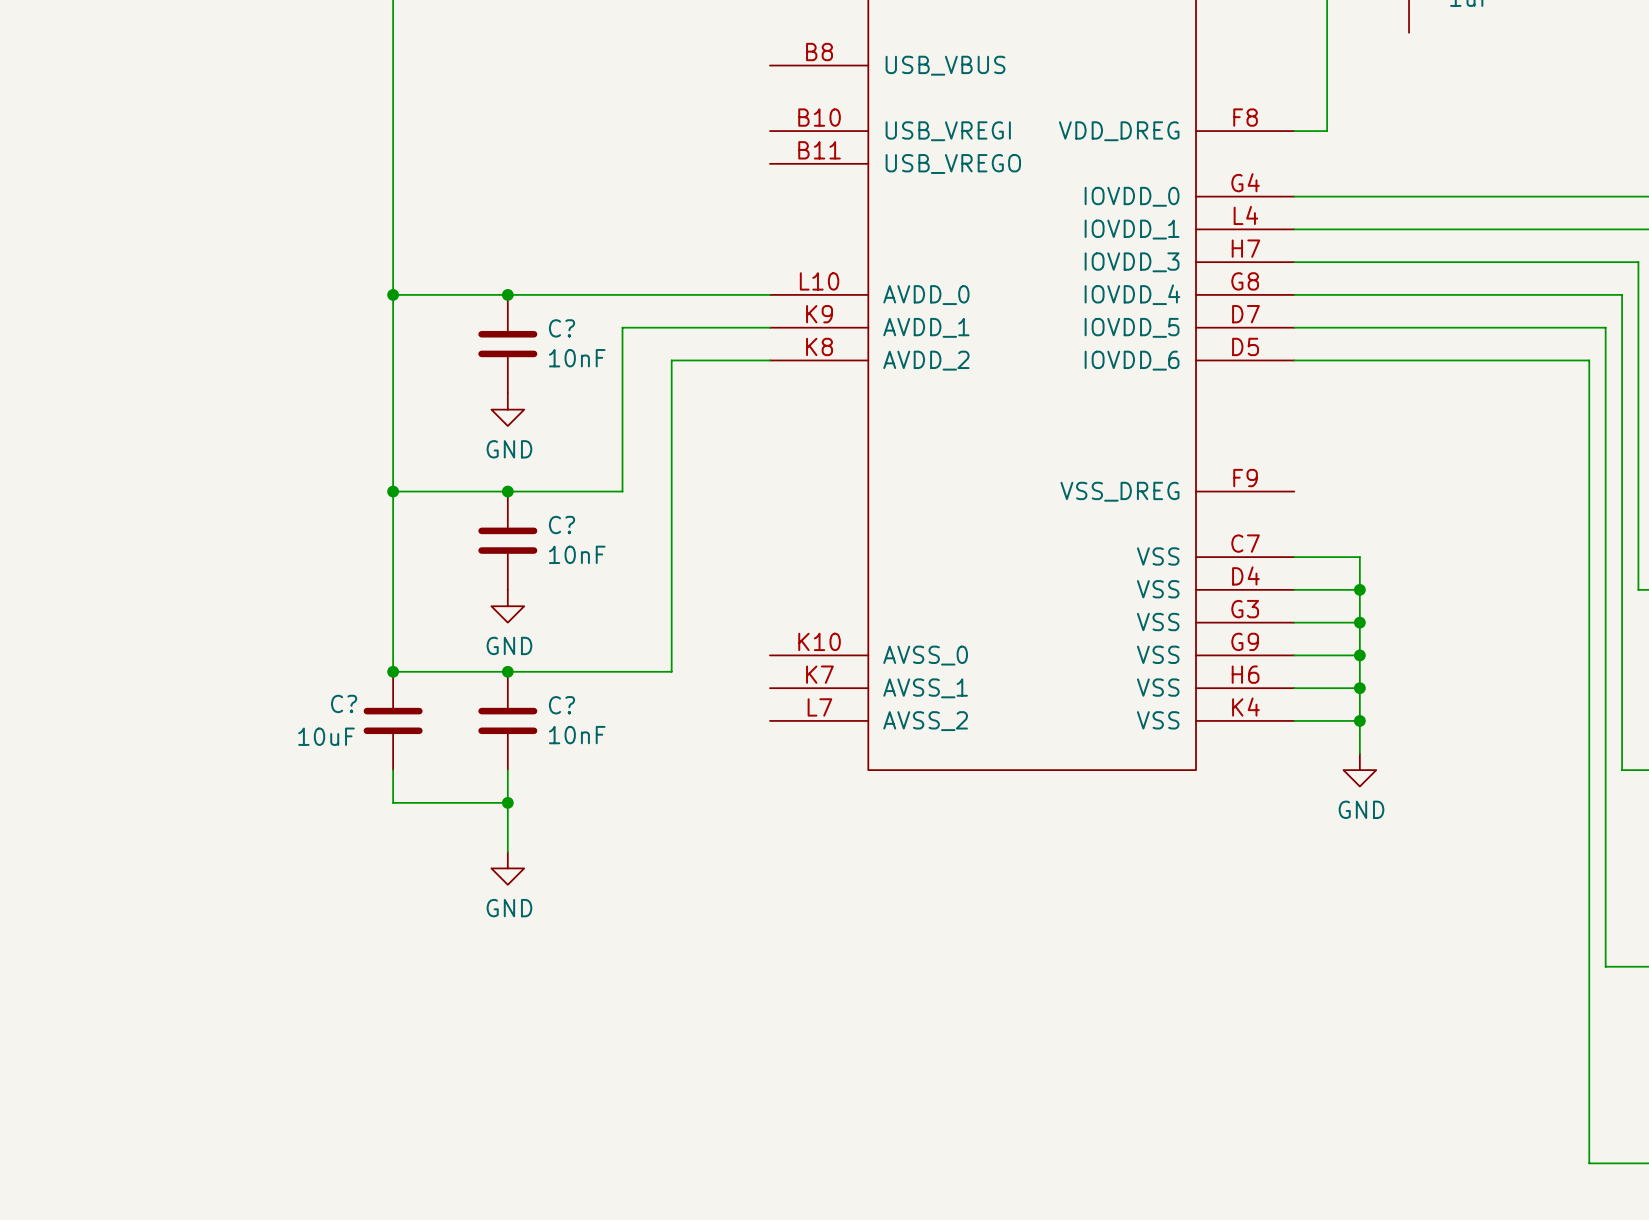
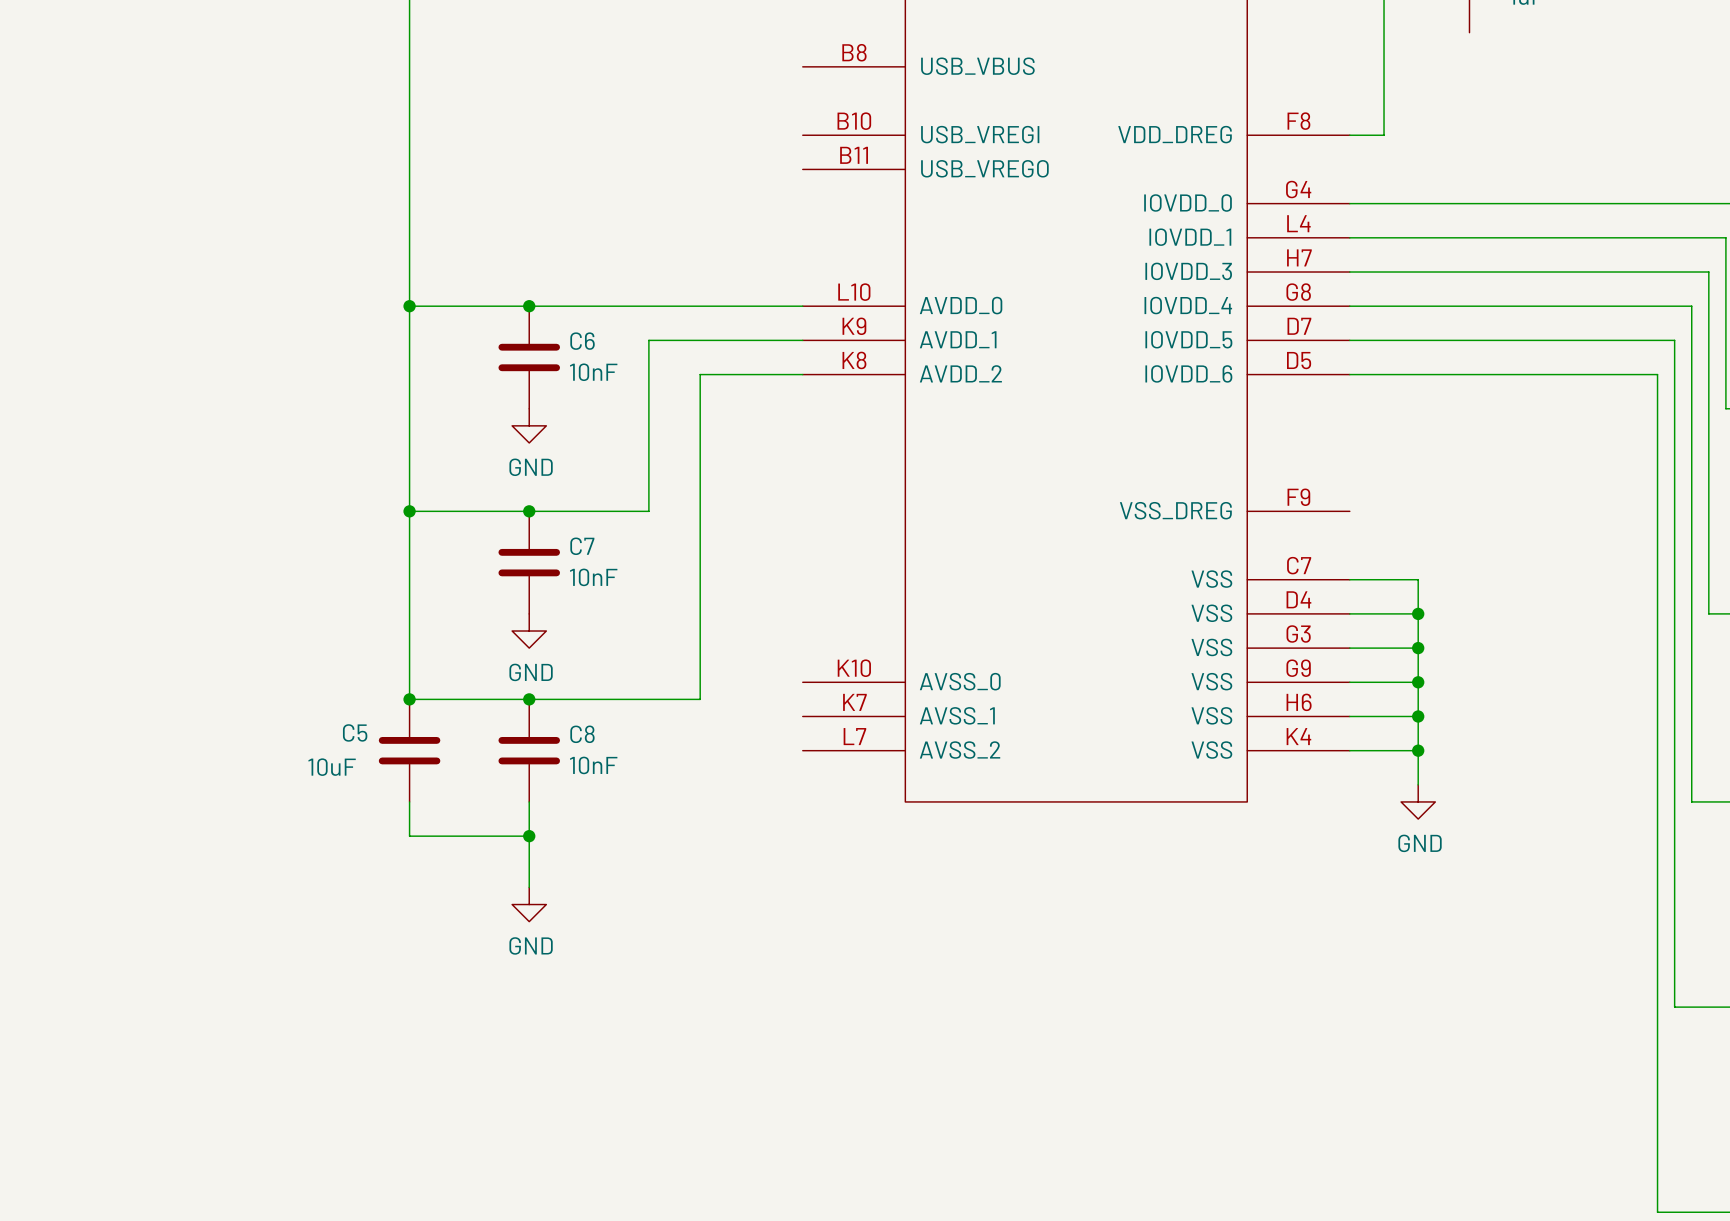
C? name: C? (562, 328) -> C6 (582, 341)
C? name: C? (562, 525) -> C7 (582, 546)
C? name: C? (344, 703) -> C5 (355, 732)
C? name: C? (562, 705) -> C8 (582, 734)

